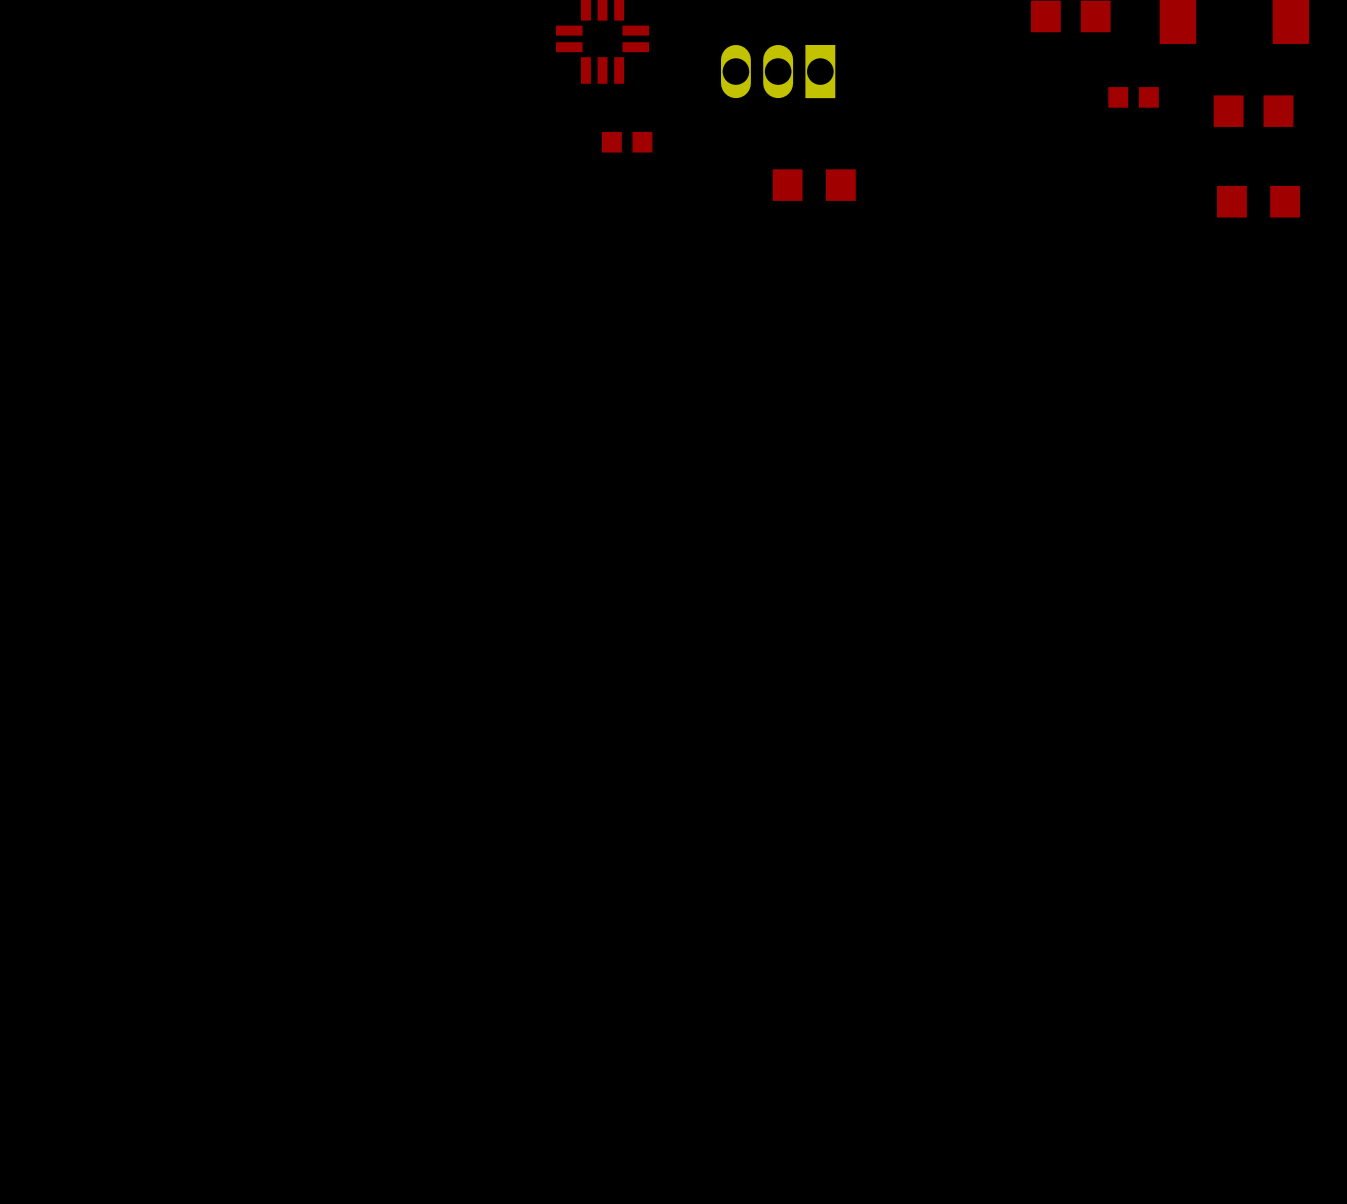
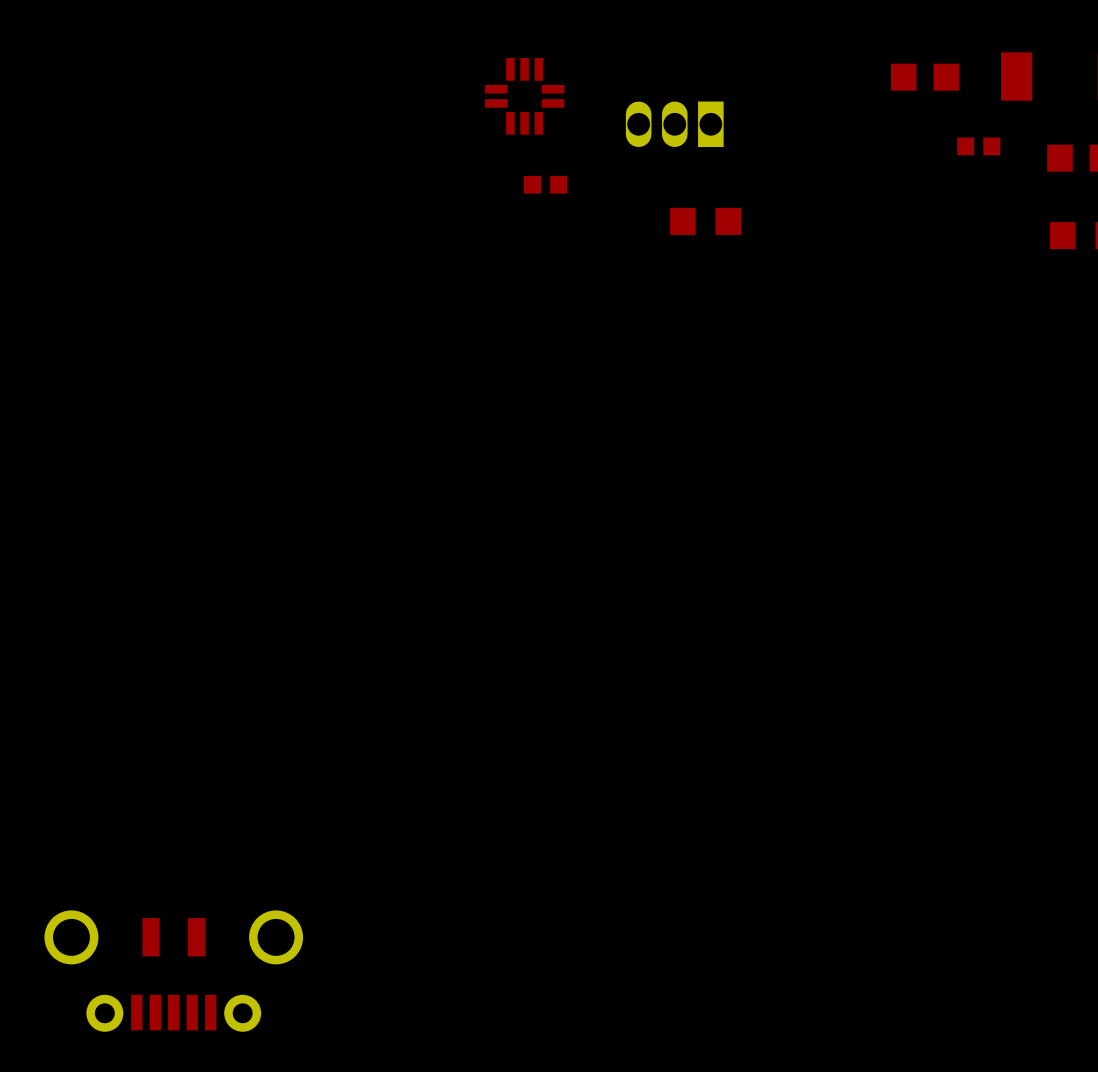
part: none -> (173, 971)

